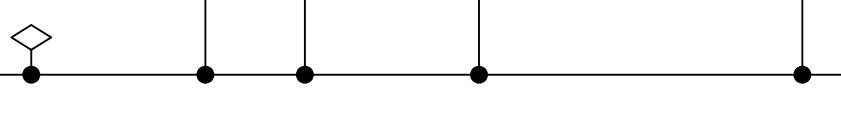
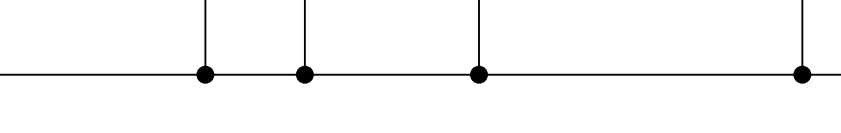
power symbol: (31, 49) -> none
junction: (31, 74) -> none

